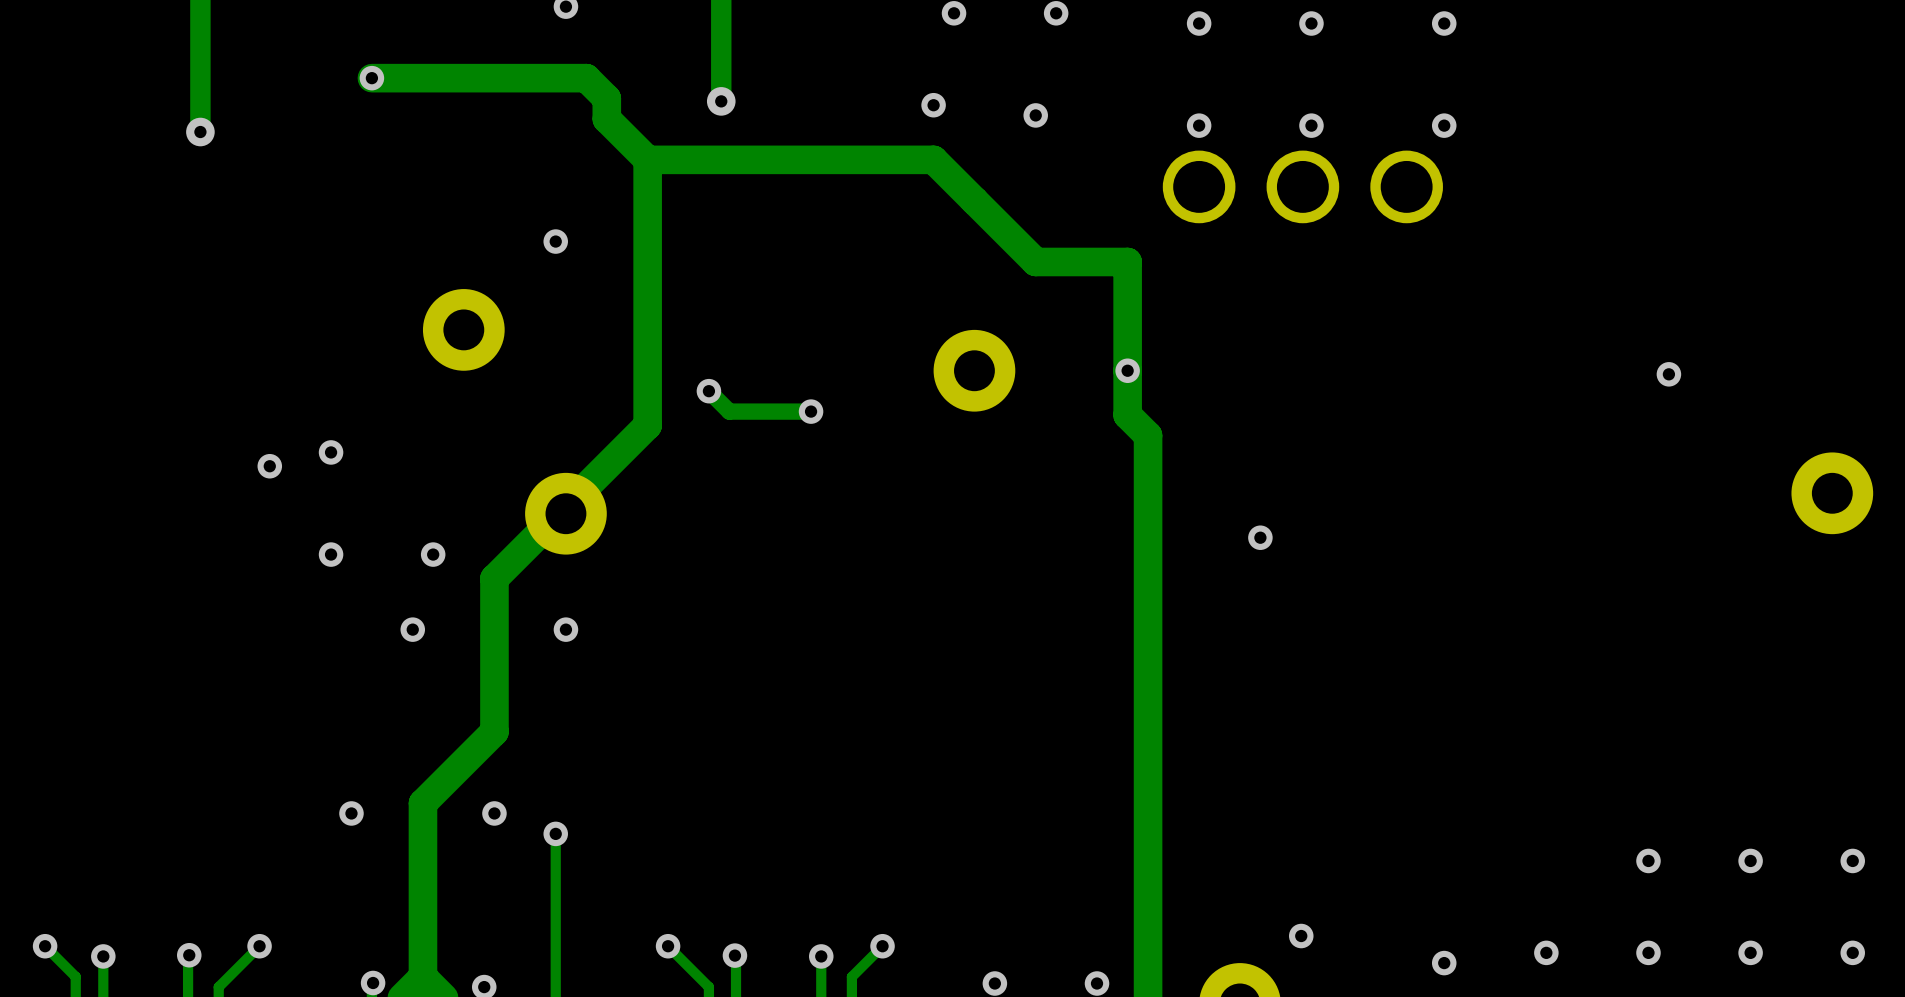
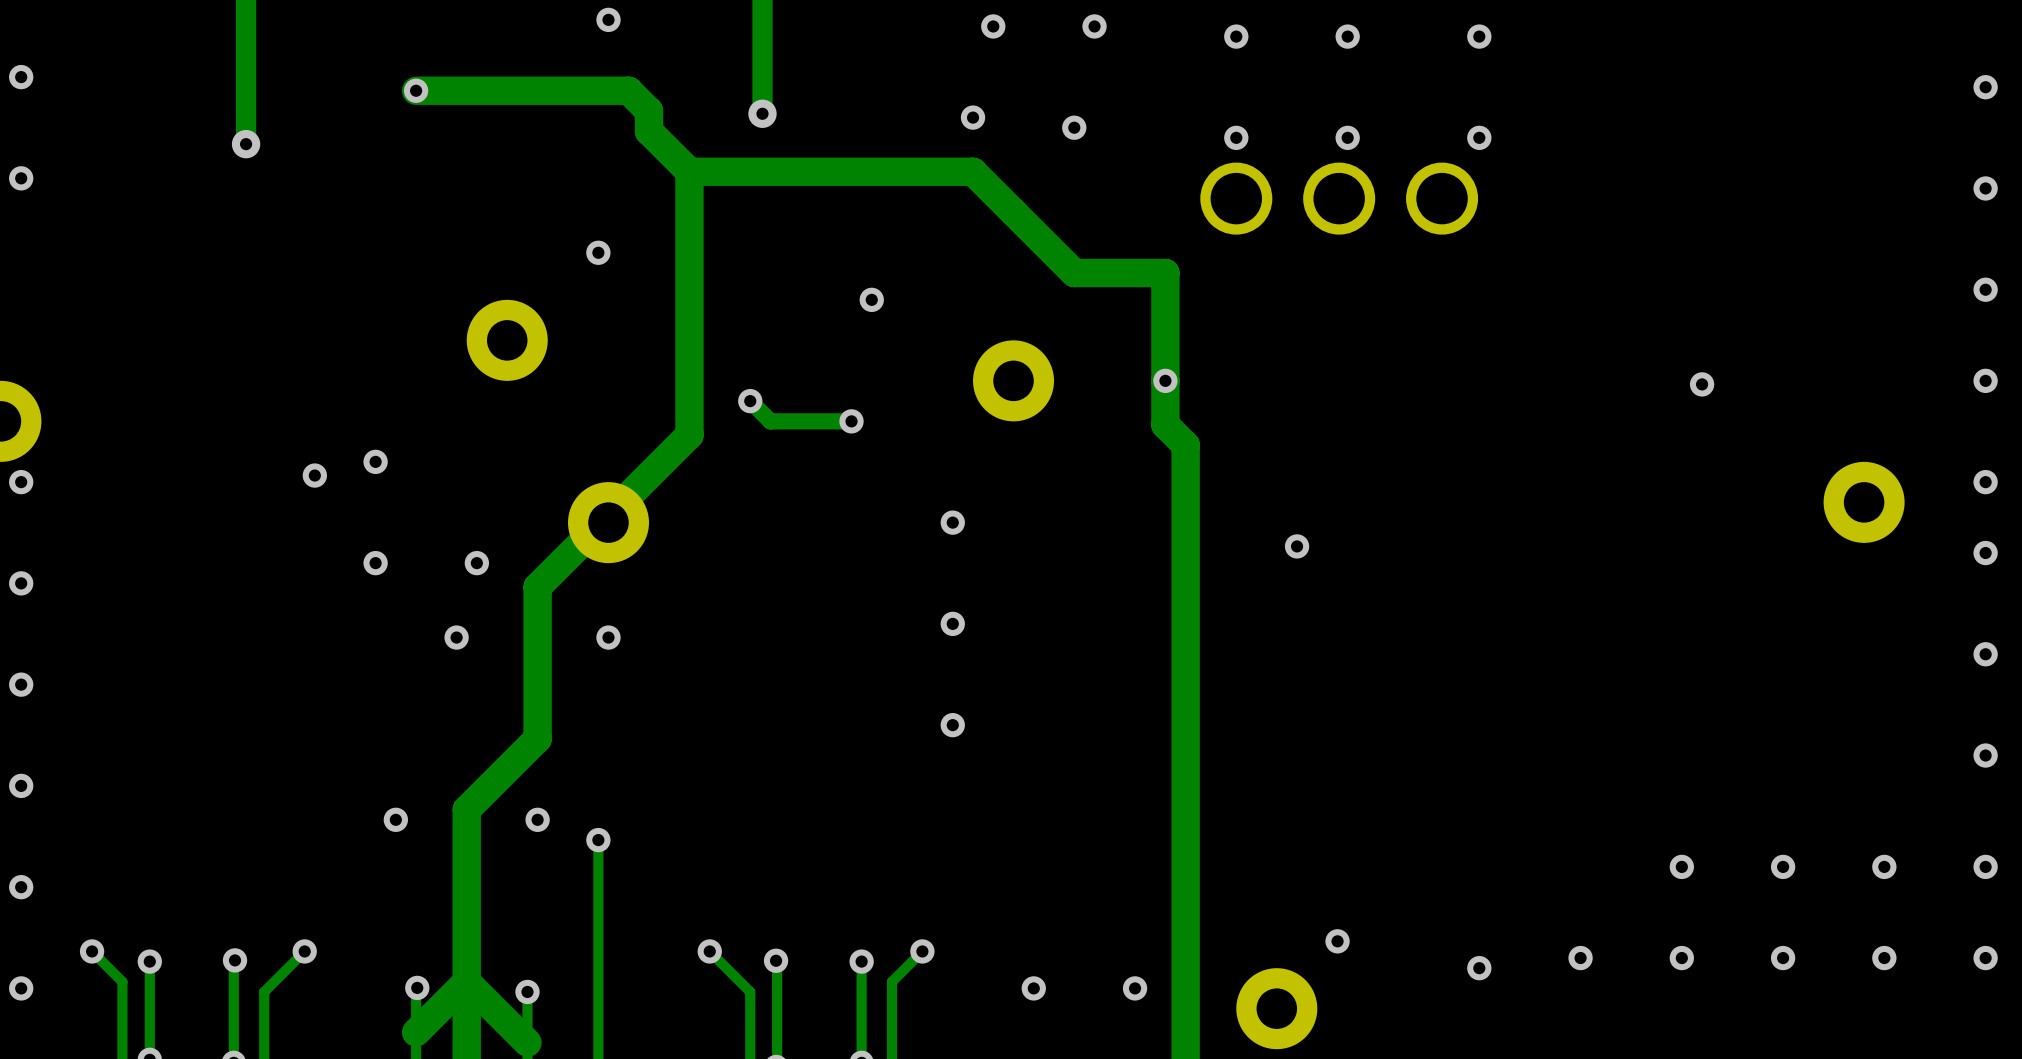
via: none -> (871, 299)
via: none -> (952, 522)
via: none -> (952, 623)
via: none -> (952, 725)

